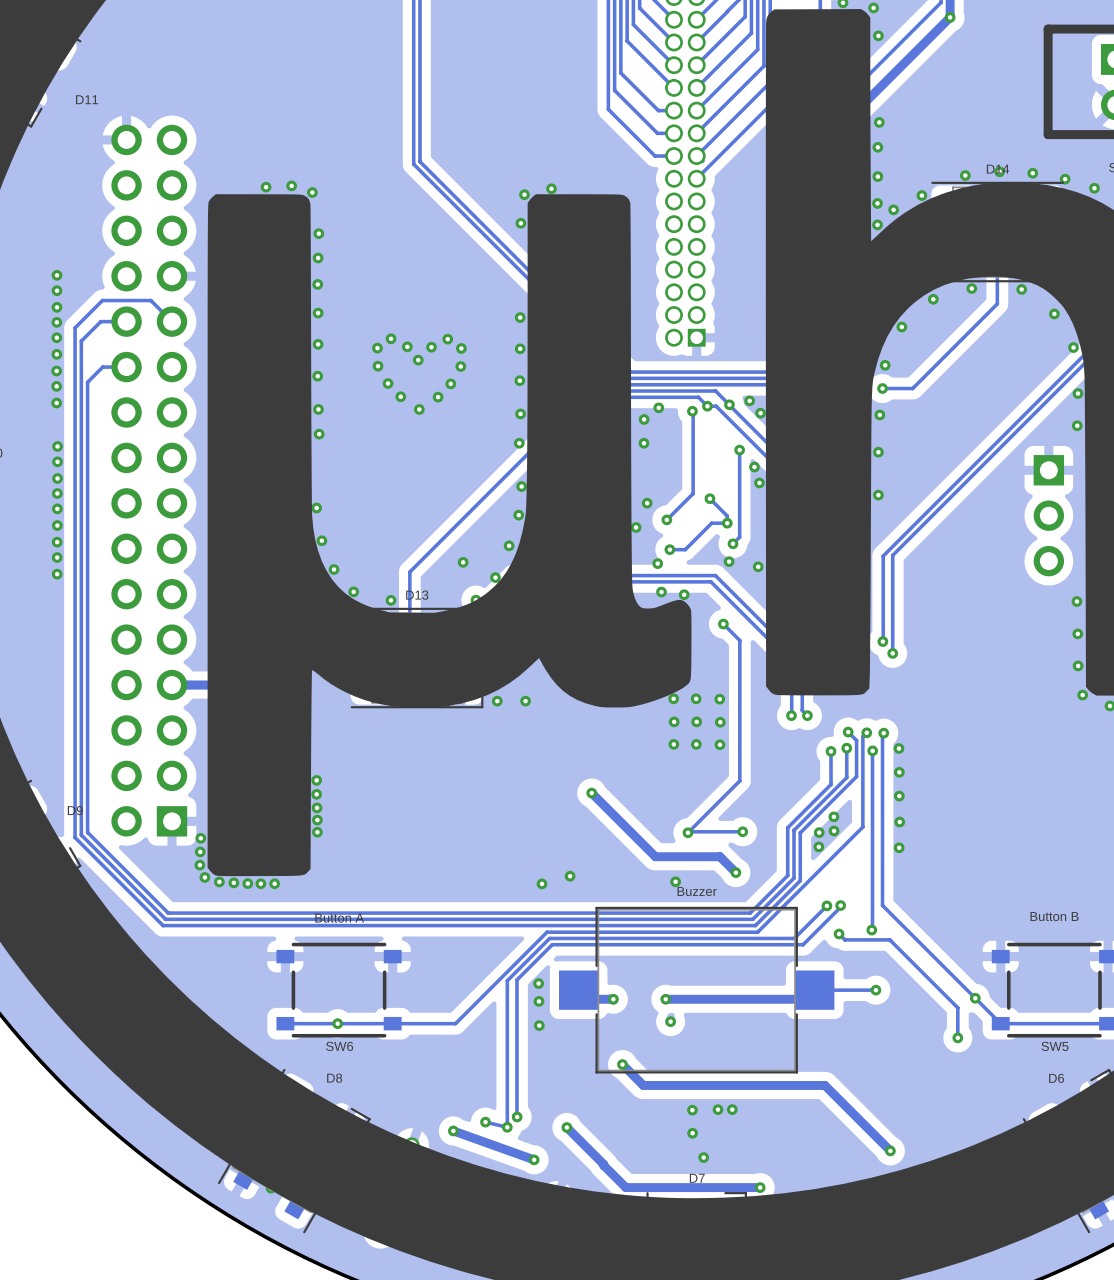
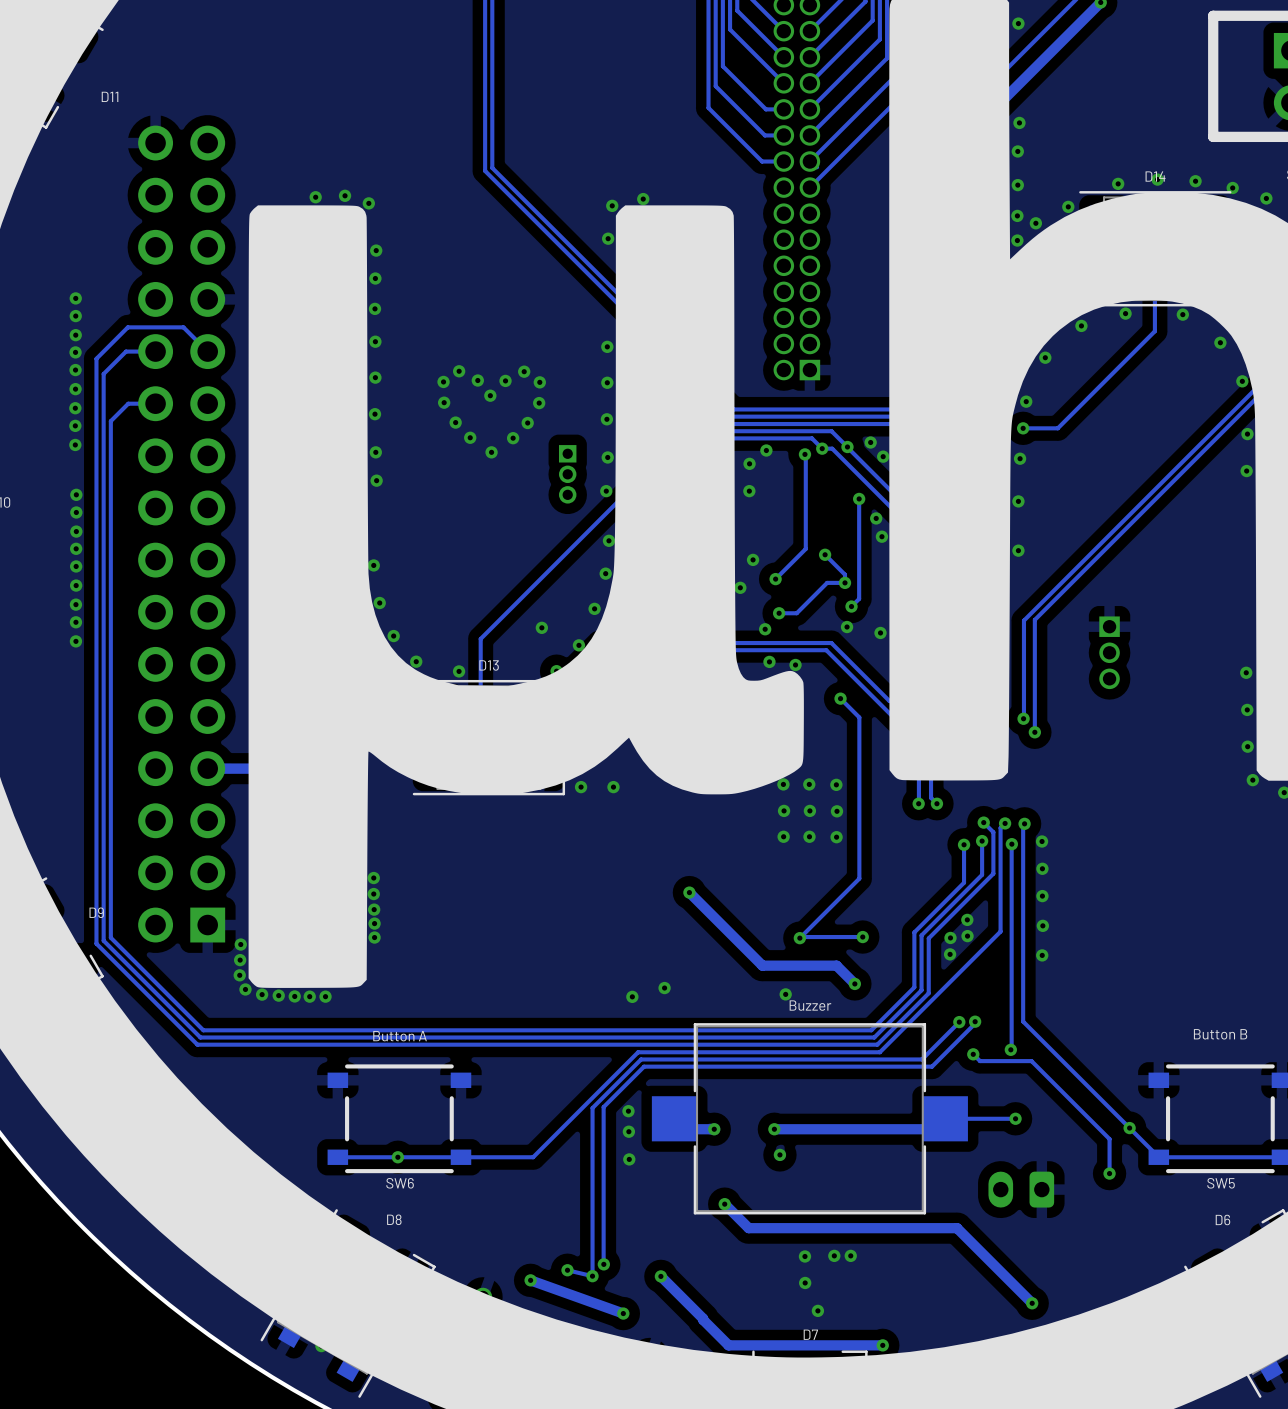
part: none -> (567, 474)
part: (1048, 515) -> none
part: none -> (1109, 652)
part: none -> (1021, 1189)

